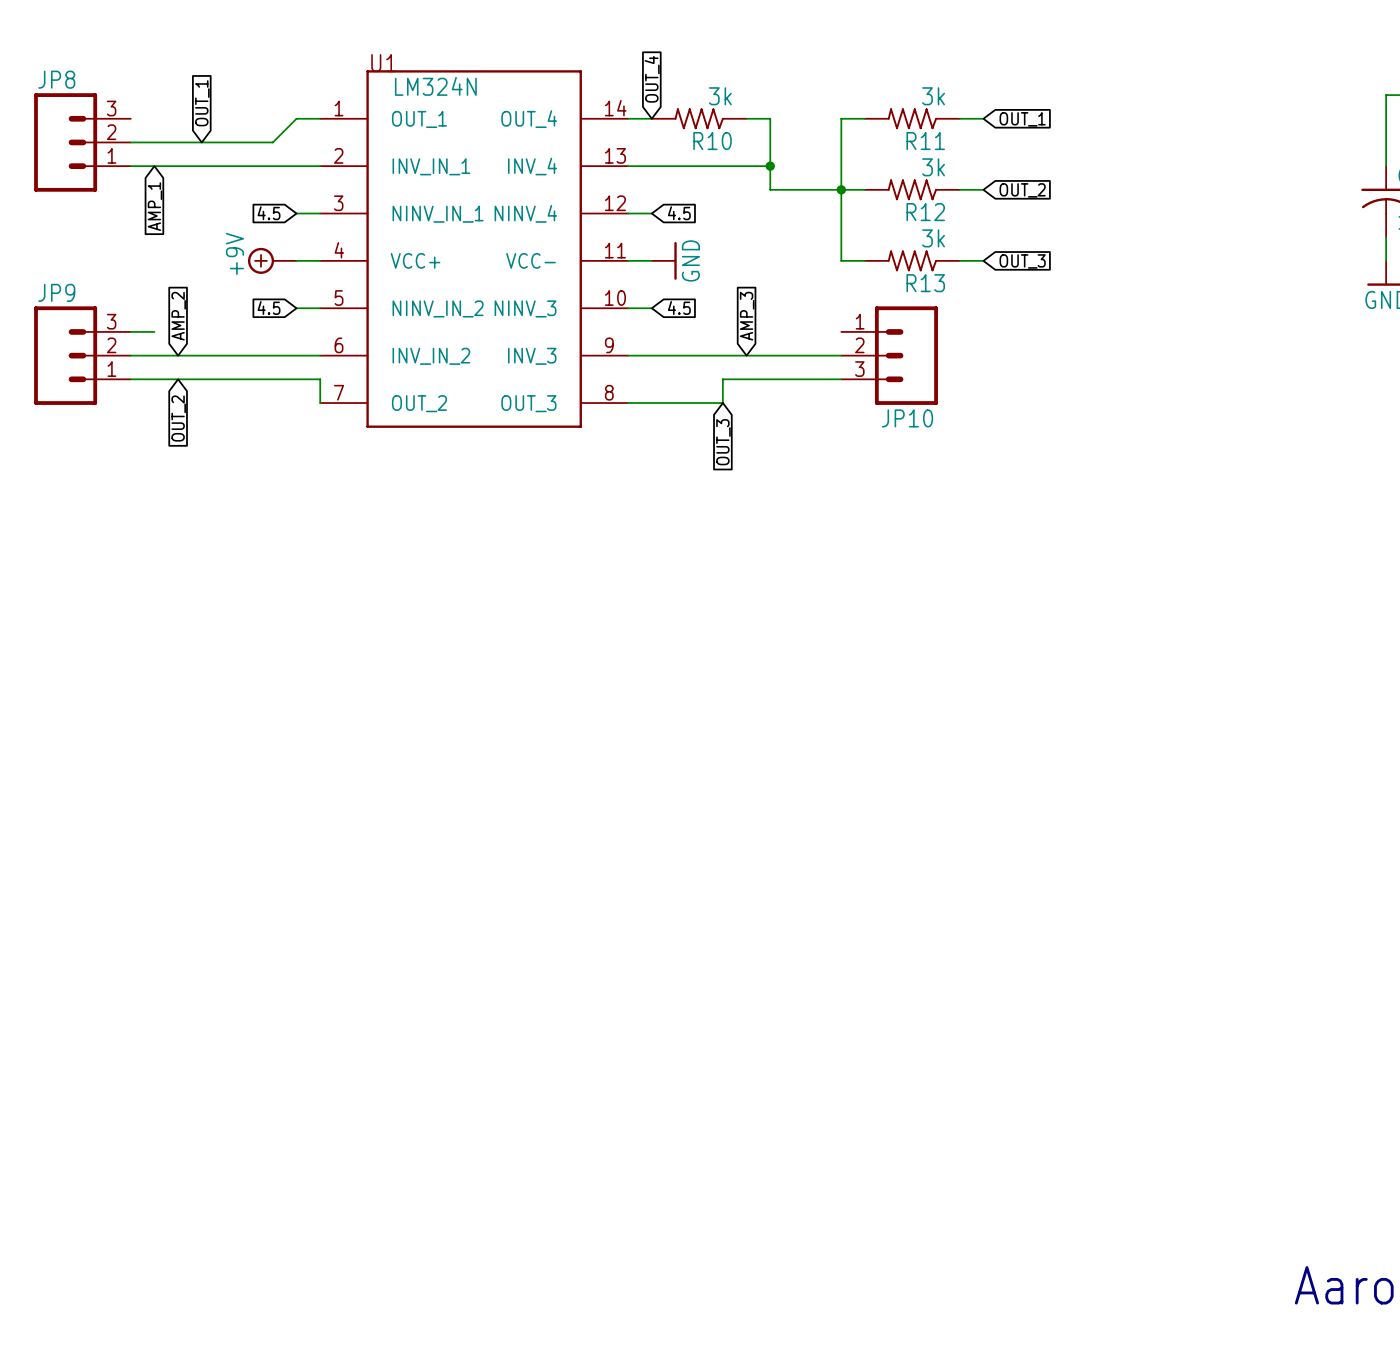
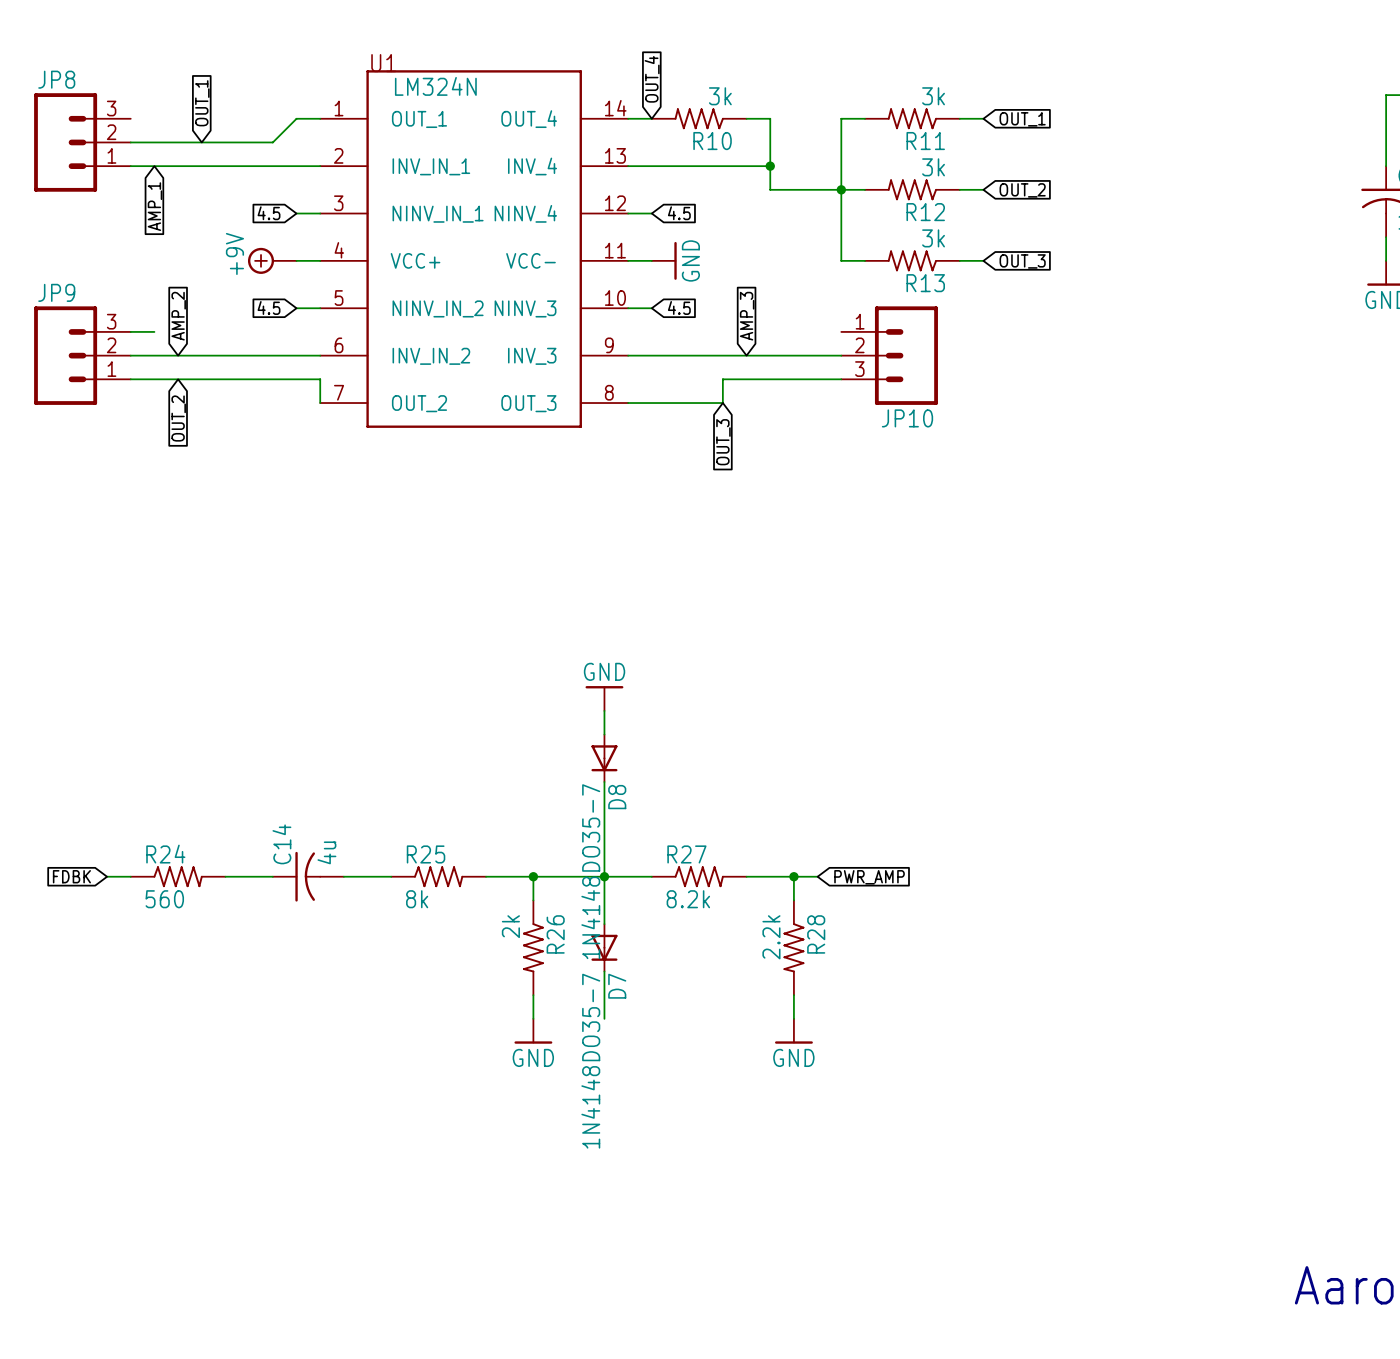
power symbol: none -> GND (604, 698)
wire: none -> (604, 710) (604, 734)
D8: none -> 1N4148DO35-7 (604, 758)
wire: none -> (604, 781) (604, 924)
global label: none -> FDBK (71, 876)
wire: none -> (107, 876) (130, 876)
R24: none -> 560 (178, 876)
wire: none -> (225, 876) (272, 876)
C14: none -> 4u (308, 876)
wire: none -> (343, 876) (391, 876)
R25: none -> 8k (438, 876)
wire: none -> (486, 876) (651, 876)
wire: none -> (533, 876) (533, 900)
junction: none -> (533, 876)
junction: none -> (604, 876)
R27: none -> 8.2k (699, 876)
wire: none -> (746, 876) (817, 876)
wire: none -> (793, 876) (793, 900)
junction: none -> (793, 876)
global label: none -> PWR_AMP (869, 877)
R26: none -> 2k (533, 947)
D7: none -> 1N4148DO35-7 (604, 947)
R28: none -> 2.2k (793, 947)
wire: none -> (604, 971) (604, 1018)
wire: none -> (533, 995) (533, 1018)
wire: none -> (793, 995) (793, 1018)
power symbol: none -> GND (533, 1031)
power symbol: none -> GND (793, 1031)

